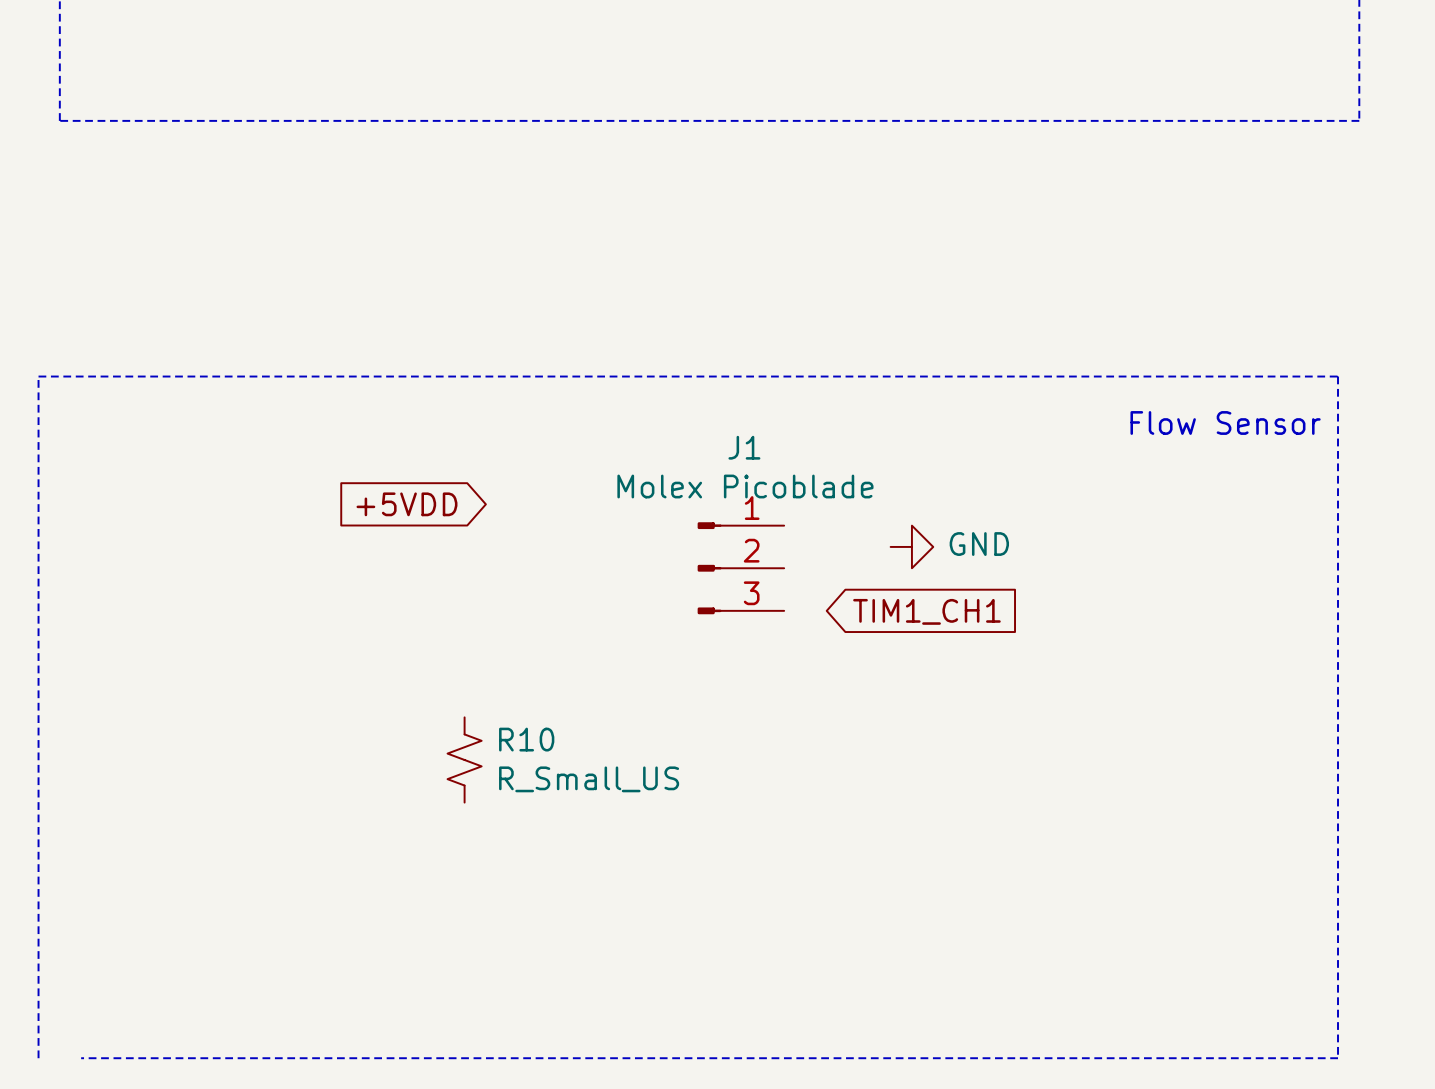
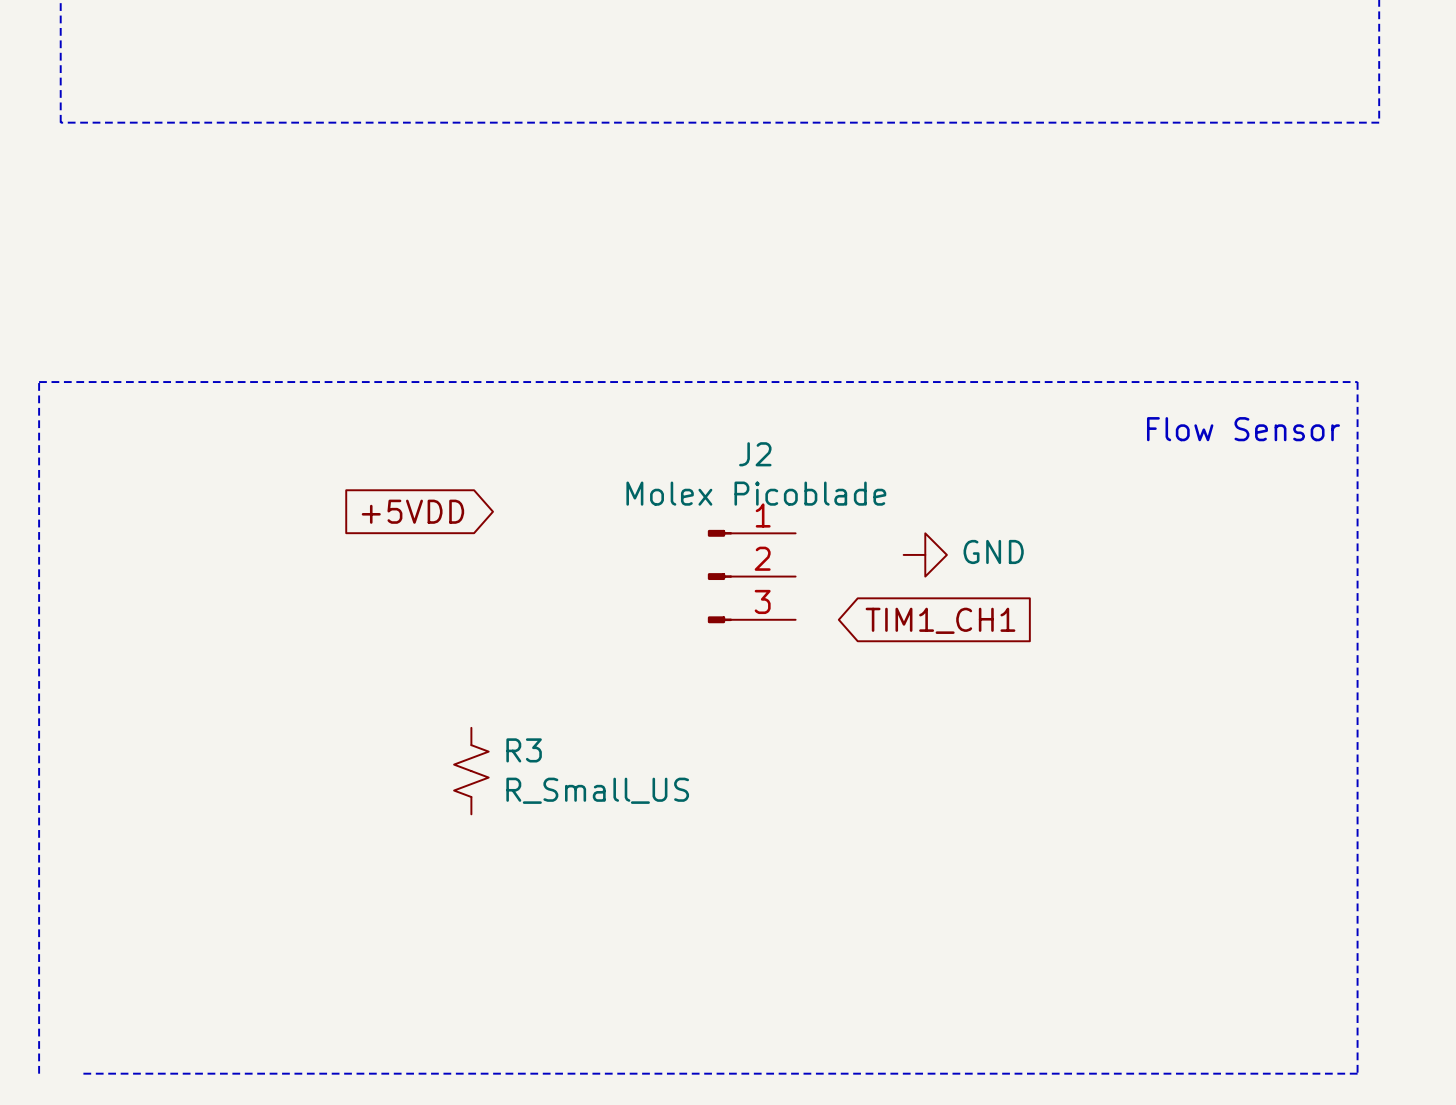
J1 name: J1 (744, 447) -> J2 (755, 454)
R10 name: R10 (526, 739) -> R3 (524, 750)

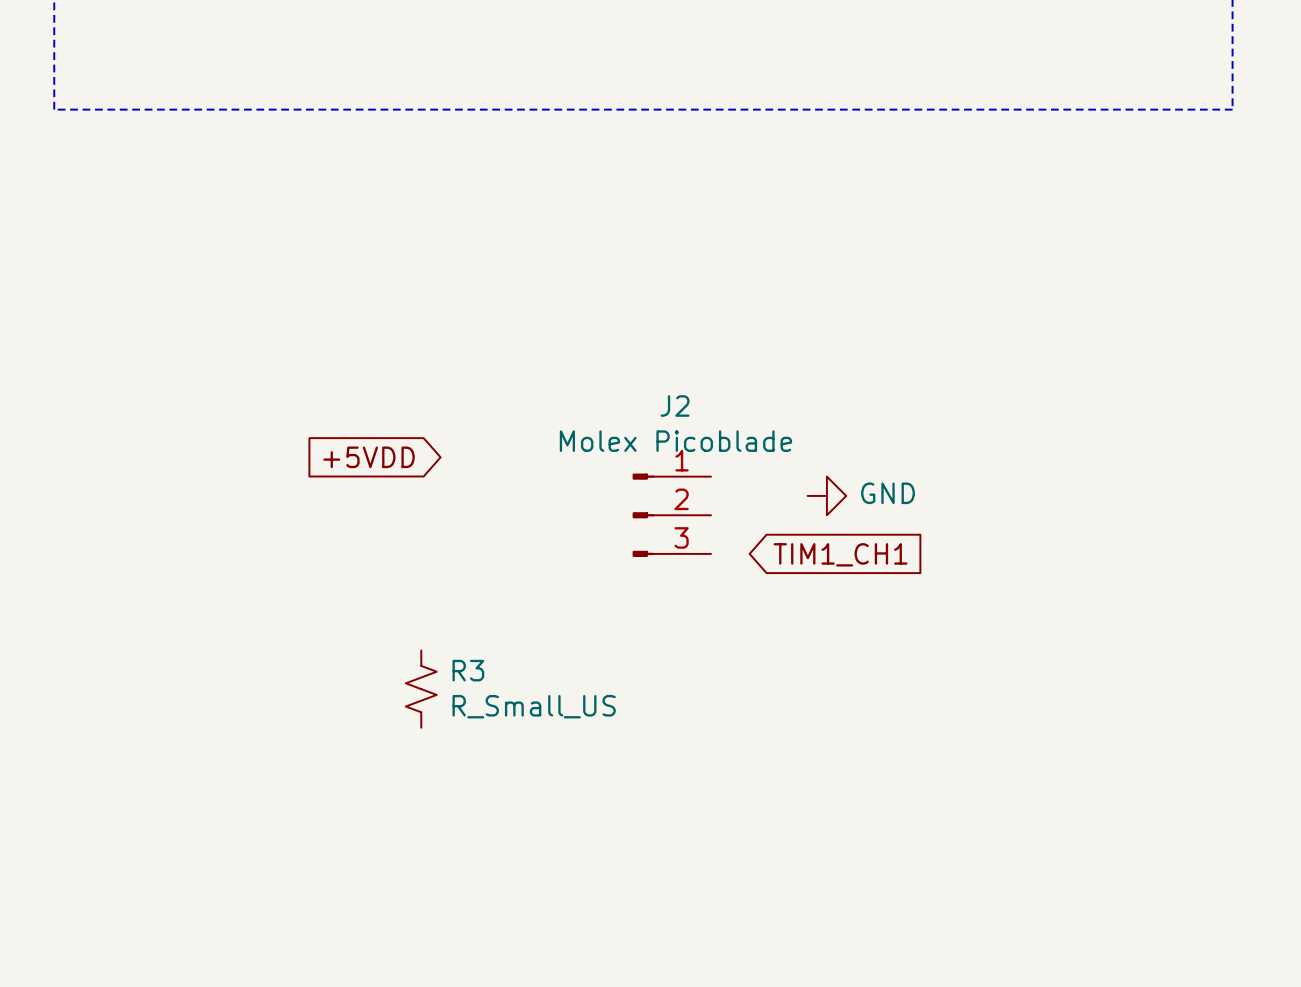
text: Flow Sensor (1243, 429) -> none
line: (39, 1073) (39, 382) (1357, 382) (1357, 1073) (82, 1073) -> none

